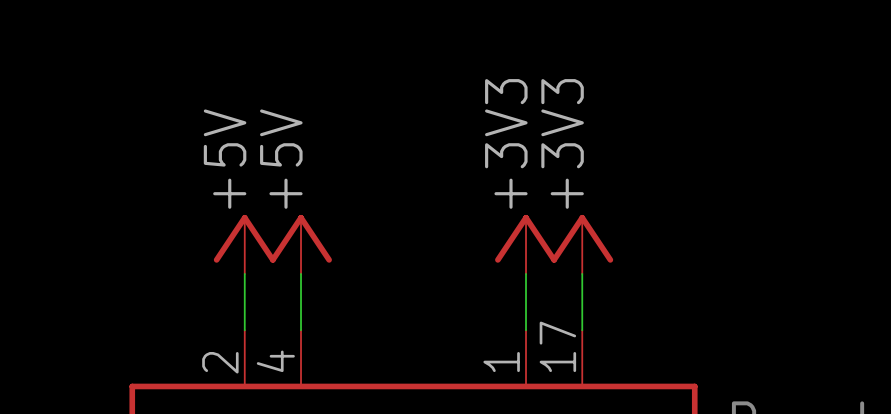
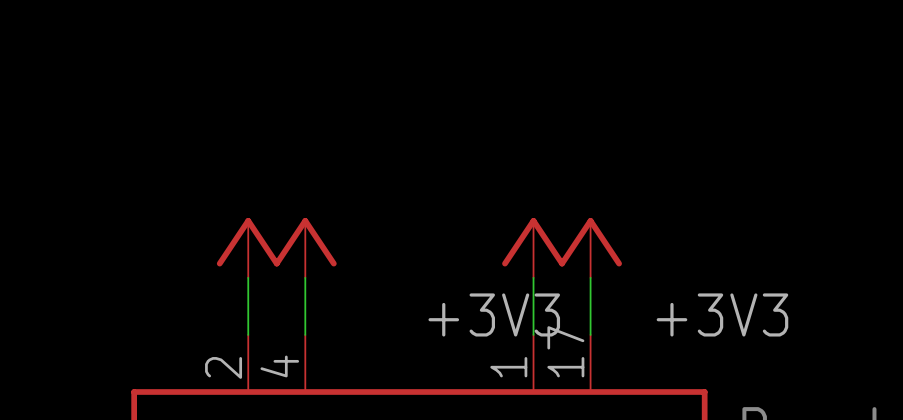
label: +3V3 (506, 143) -> none
label: +3V3 (562, 143) -> none
label: +5V (225, 159) -> none
label: +5V (281, 159) -> none
label: none -> +3V3 (494, 314)
label: none -> +3V3 (722, 314)

